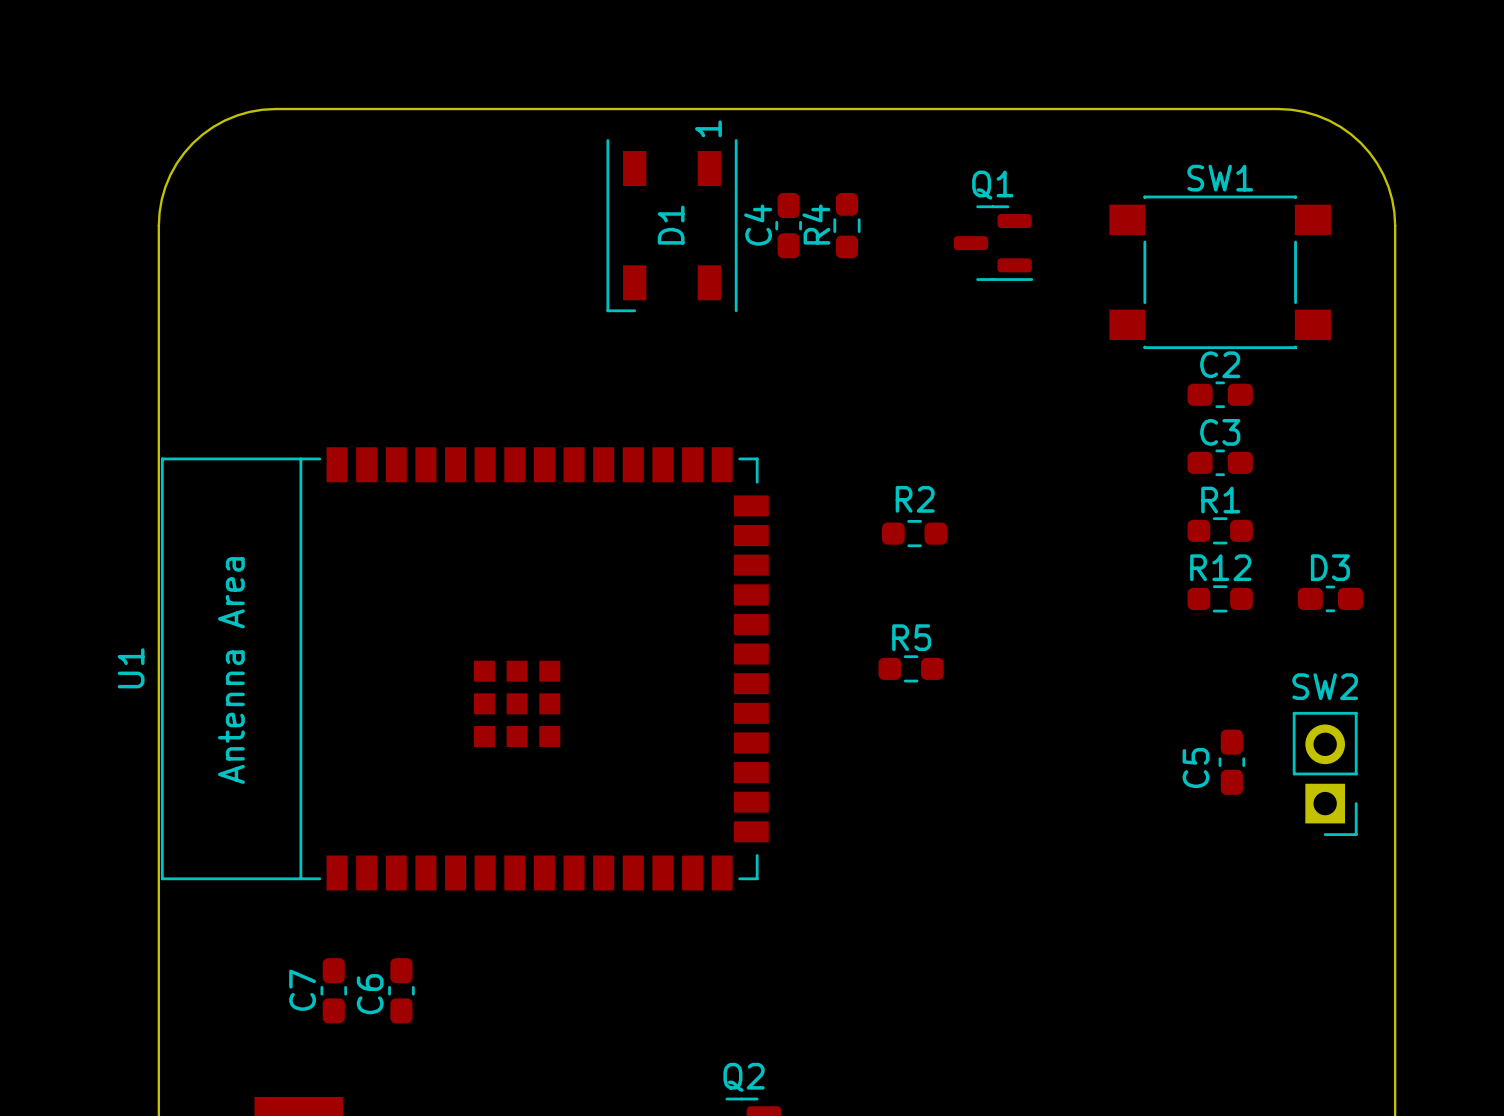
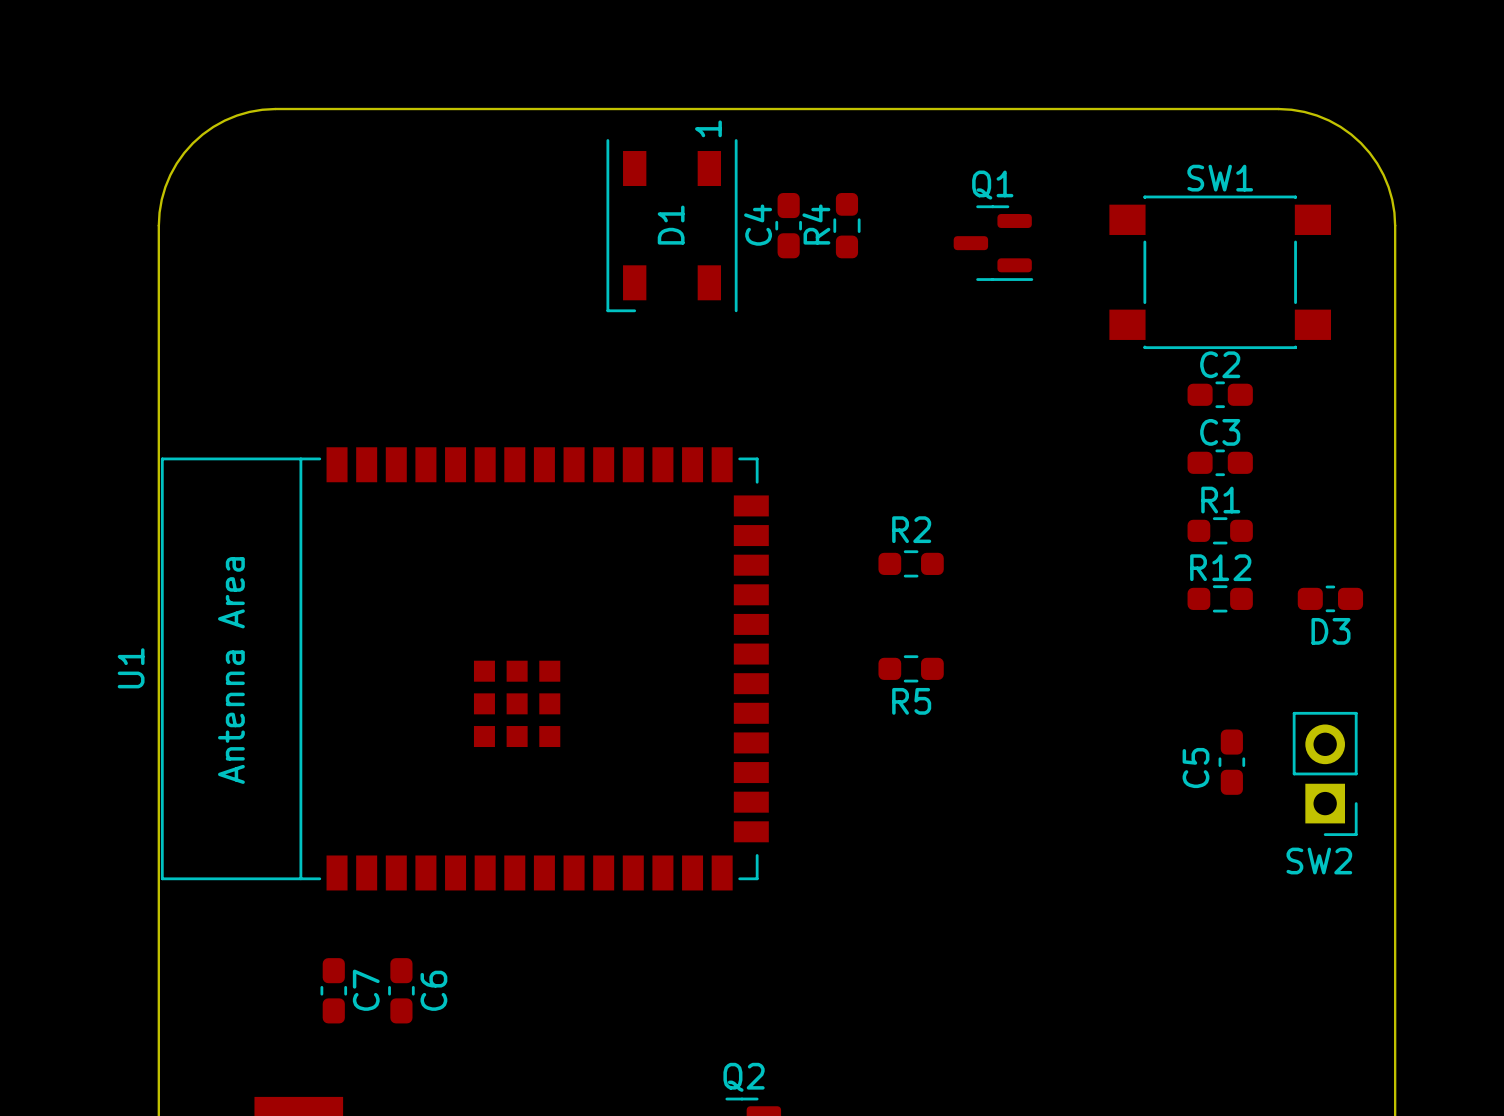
R2 position: (914, 533) -> (911, 563)
D3 name position: D3 (1330, 567) -> D3 (1330, 631)
R5 name position: R5 (911, 637) -> R5 (911, 701)
SW2 name position: SW2 (1325, 686) -> SW2 (1319, 861)
C7 name position: C7 (302, 990) -> C7 (366, 990)
C6 name position: C6 (370, 994) -> C6 (433, 990)

